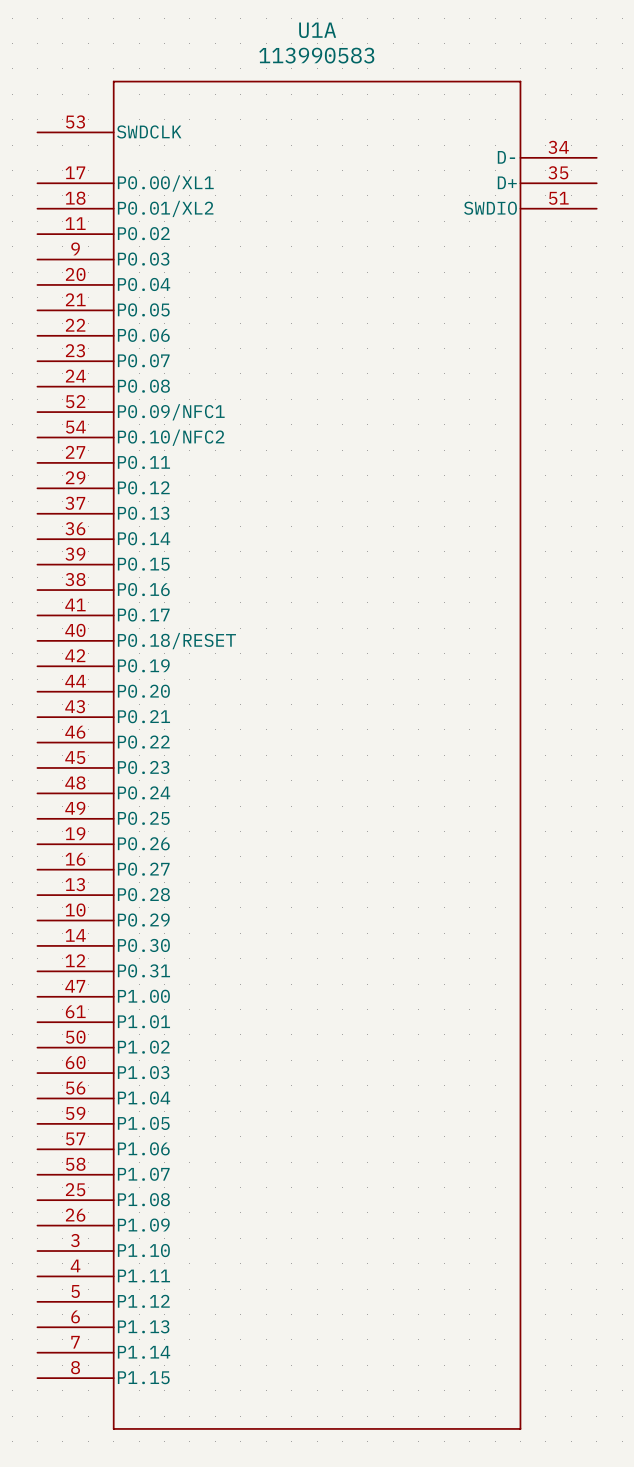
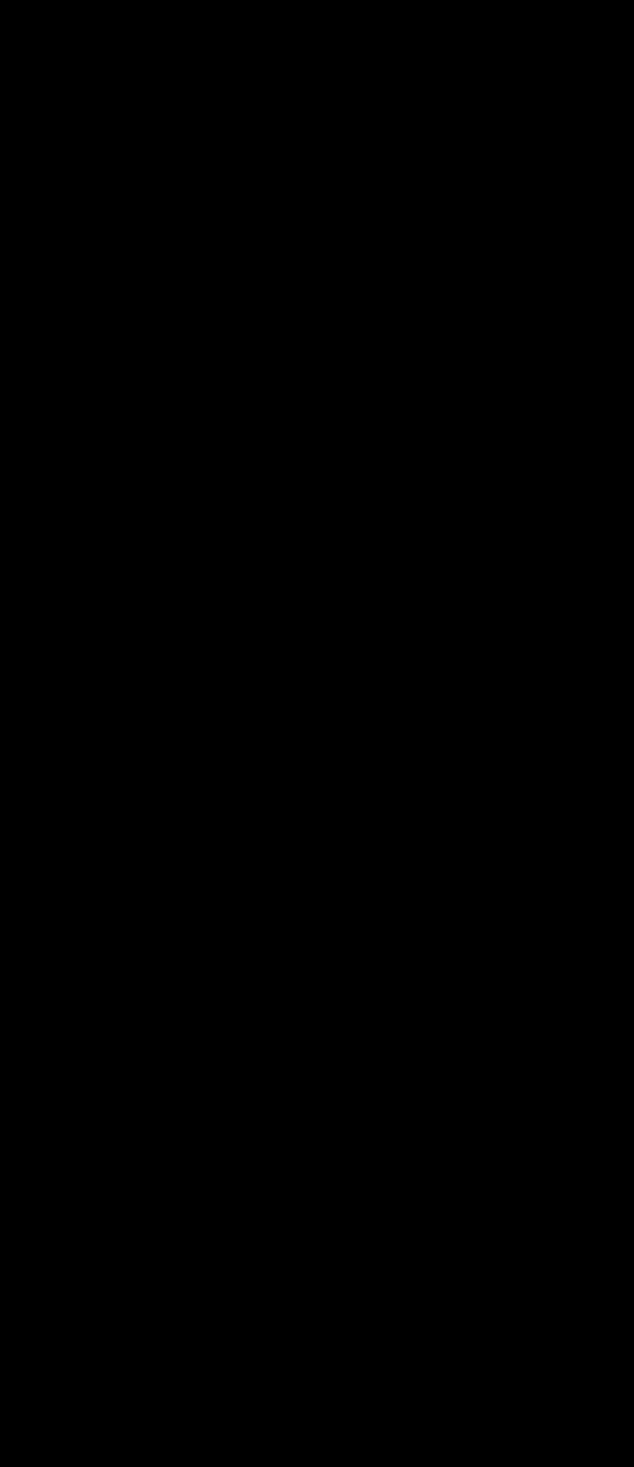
U1A: 113990583 (317, 755) -> none

